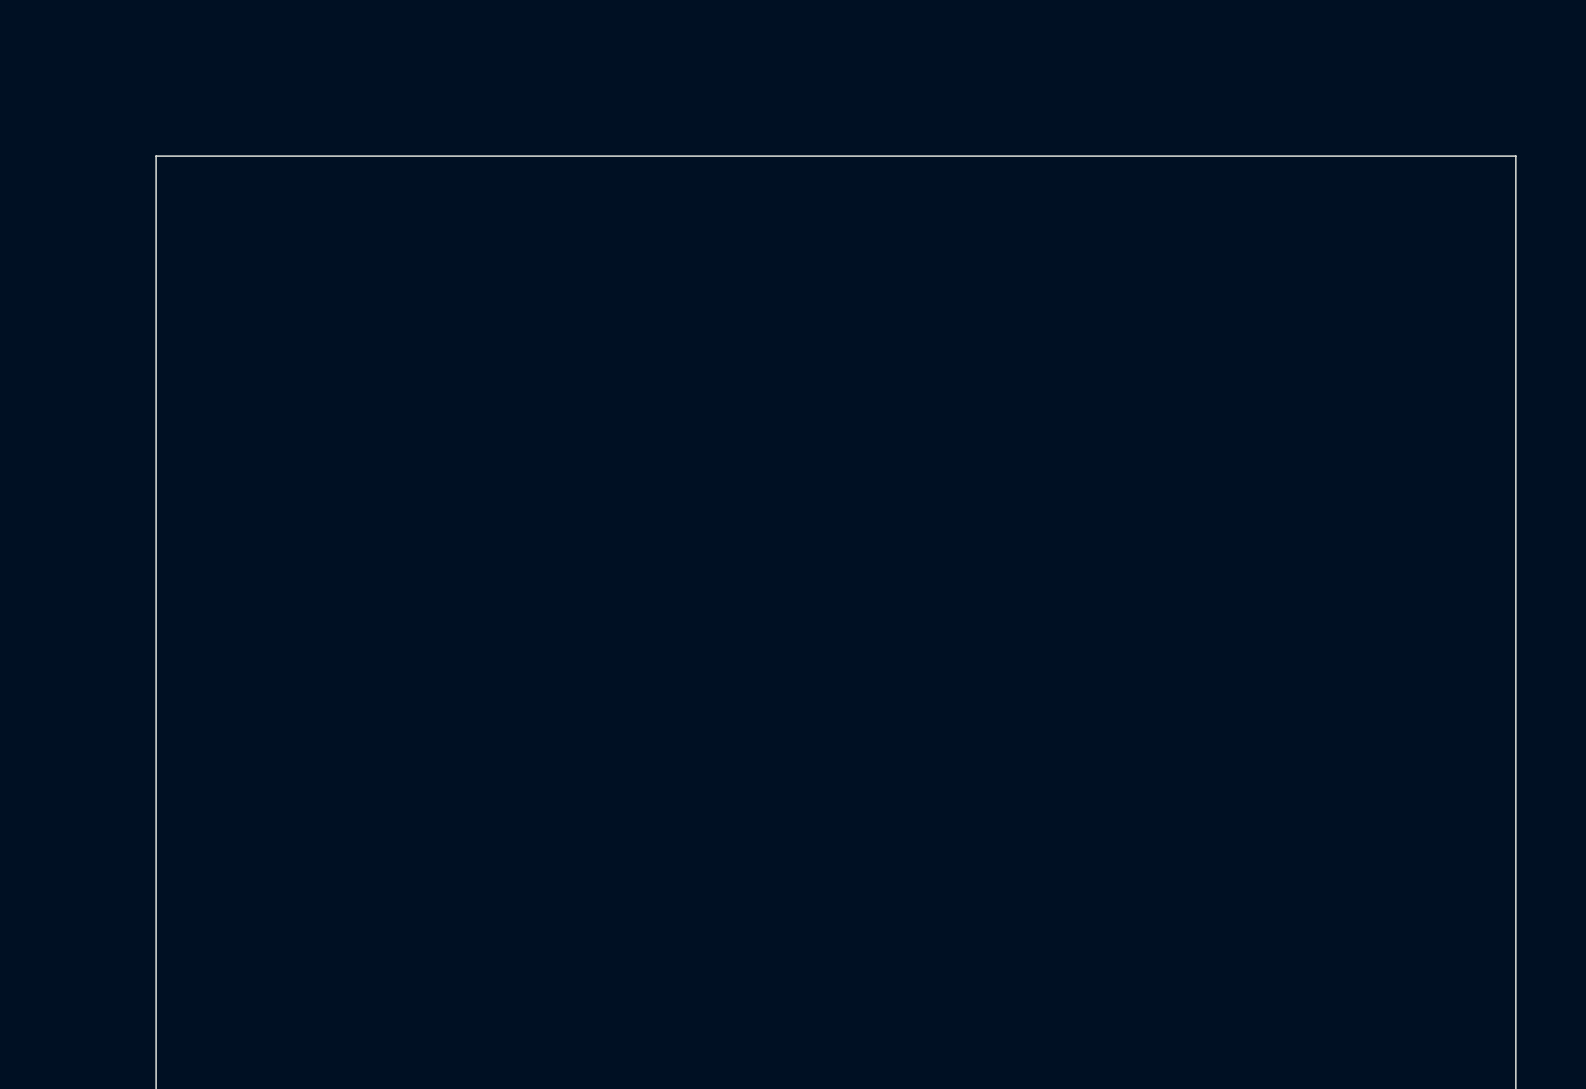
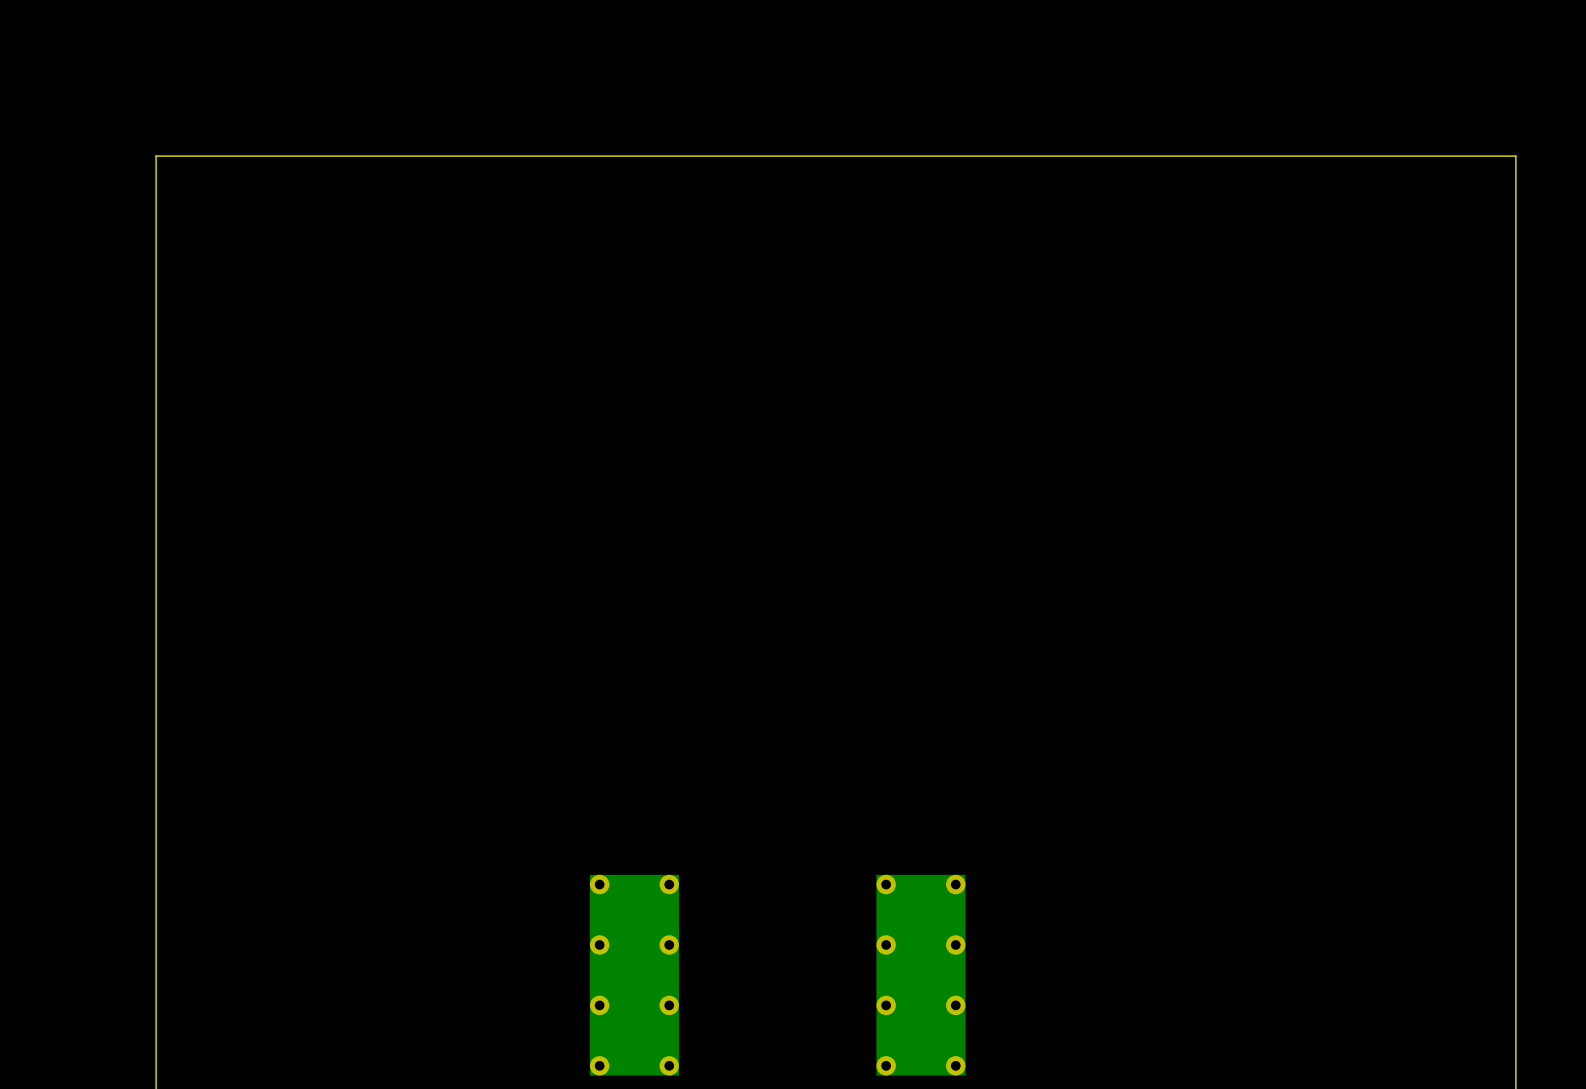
part: none -> (634, 975)
part: none -> (920, 975)

